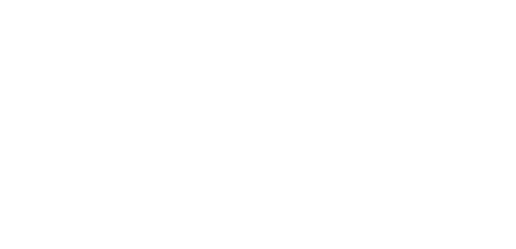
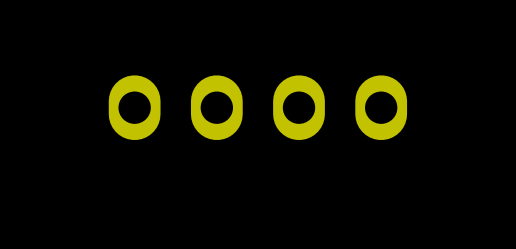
part: none -> (257, 107)

